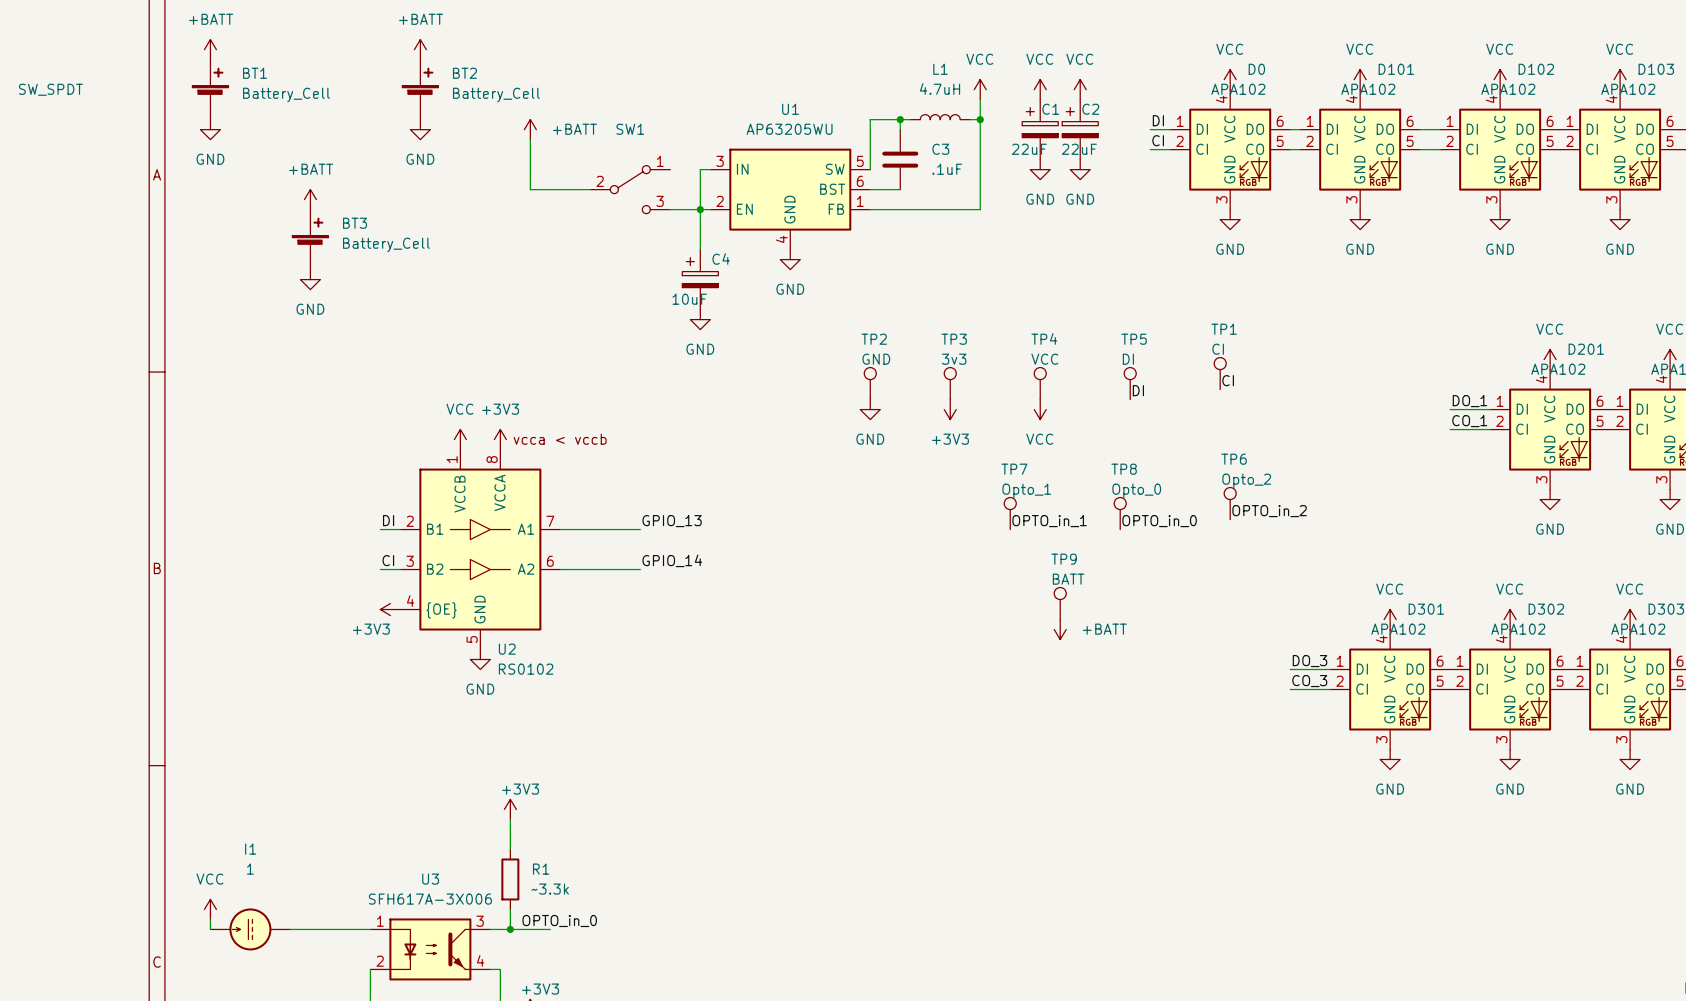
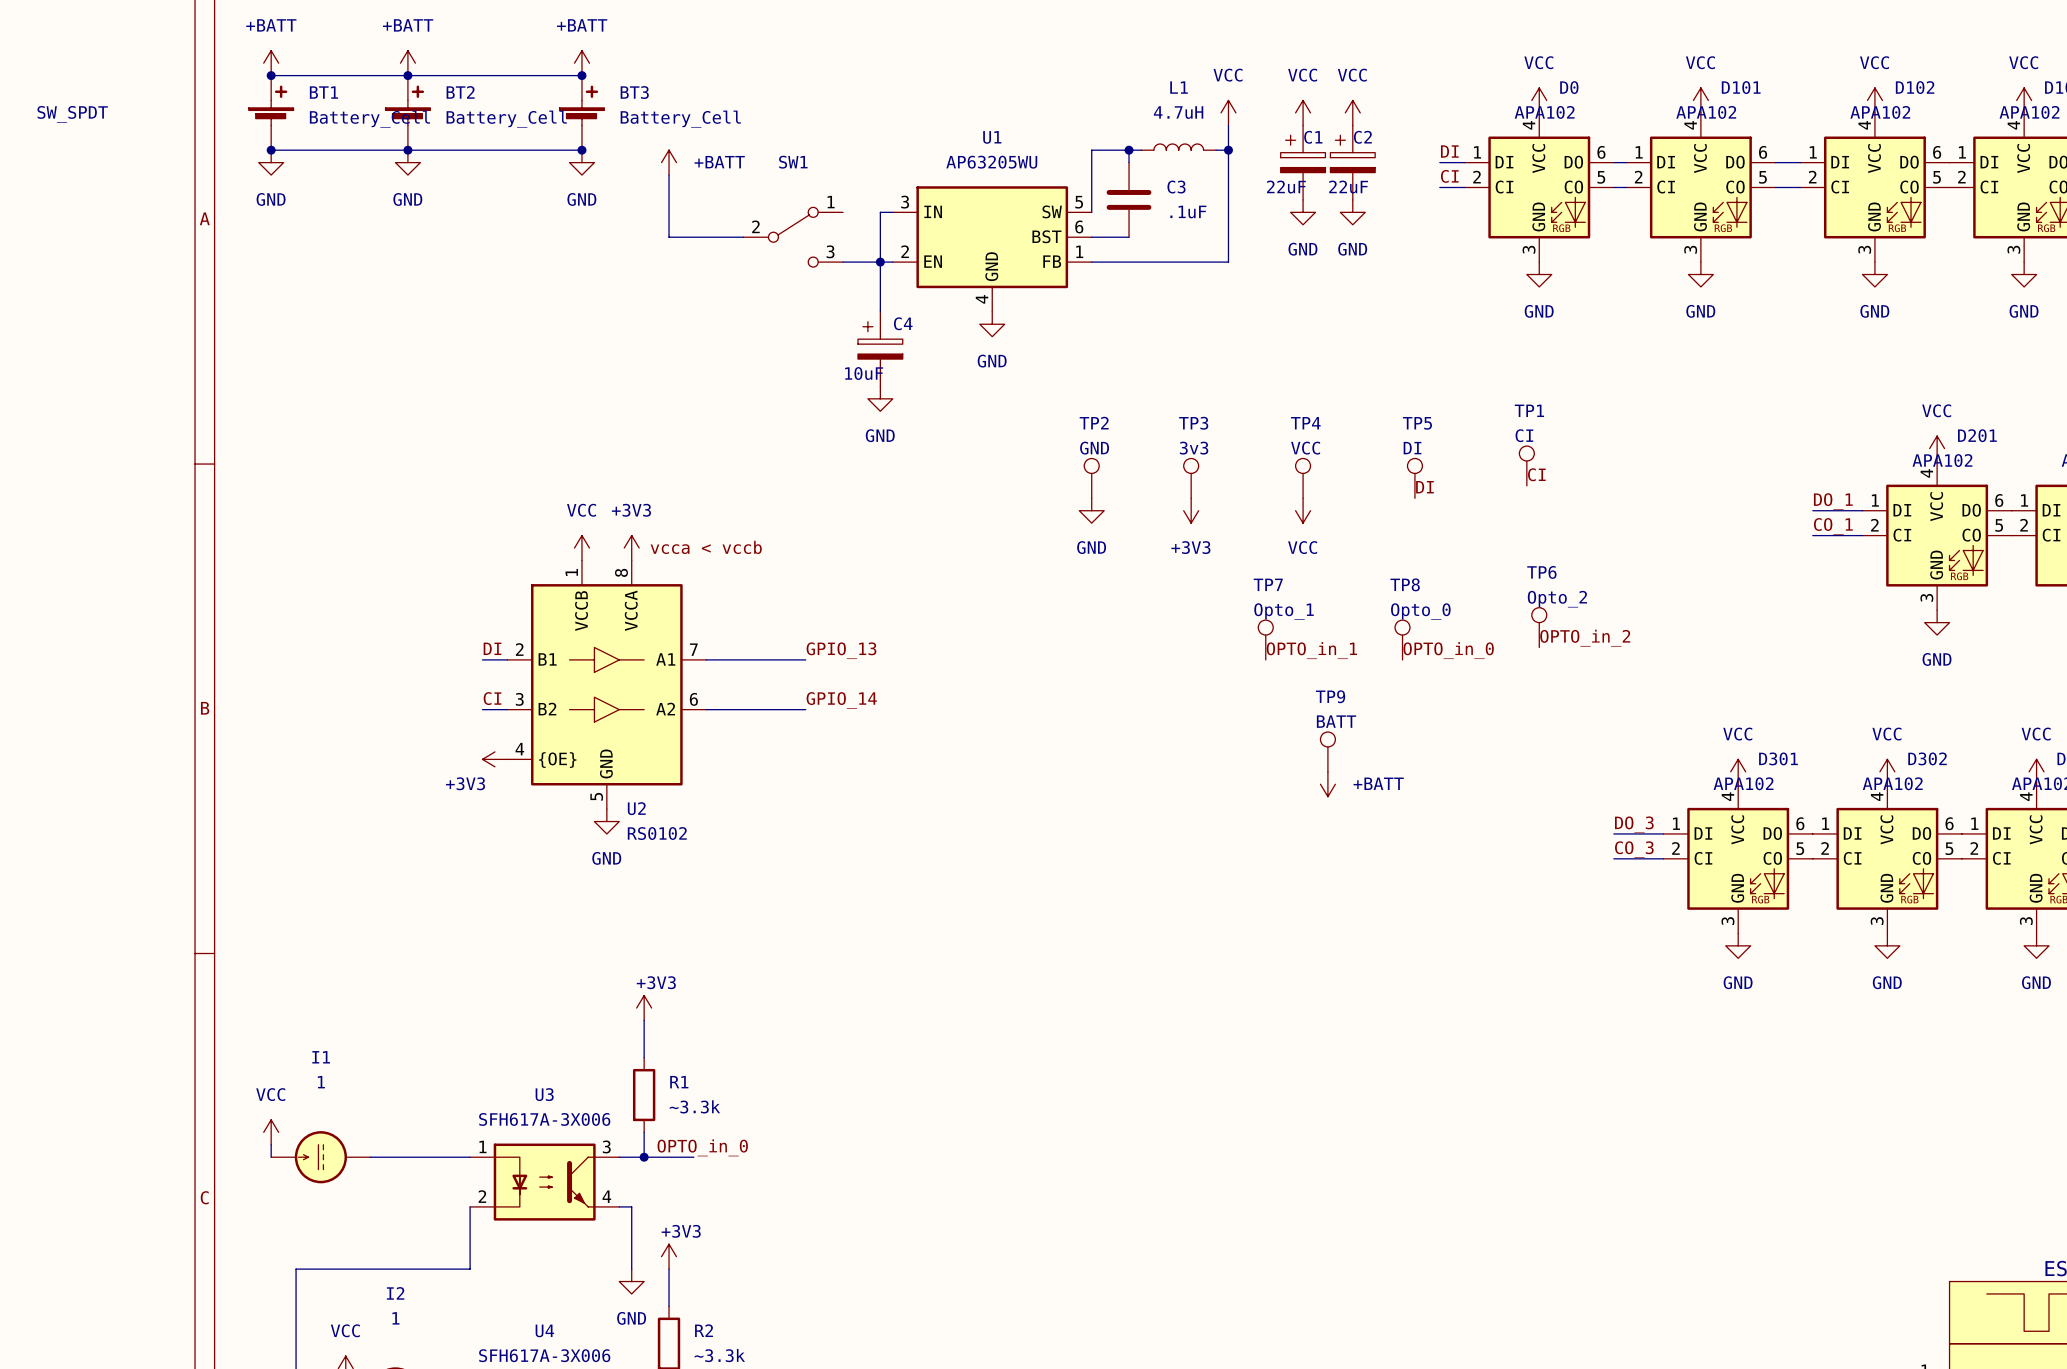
power symbol: none -> +BATT (407, 63)
power symbol position: +BATT (420, 49) -> +BATT (581, 63)
wire: none -> (271, 75) (581, 75)
junction: none -> (271, 75)
junction: none -> (407, 75)
junction: none -> (581, 75)
BT2 position: (420, 89) -> (407, 112)
wire: none -> (271, 150) (581, 150)
junction: none -> (271, 150)
junction: none -> (407, 150)
junction: none -> (581, 150)
power symbol: none -> GND (407, 162)
power symbol position: GND (420, 129) -> GND (581, 162)
power symbol: +BATT (310, 199) -> none
BT3 position: (310, 239) -> (581, 112)
power symbol: GND (310, 279) -> none

